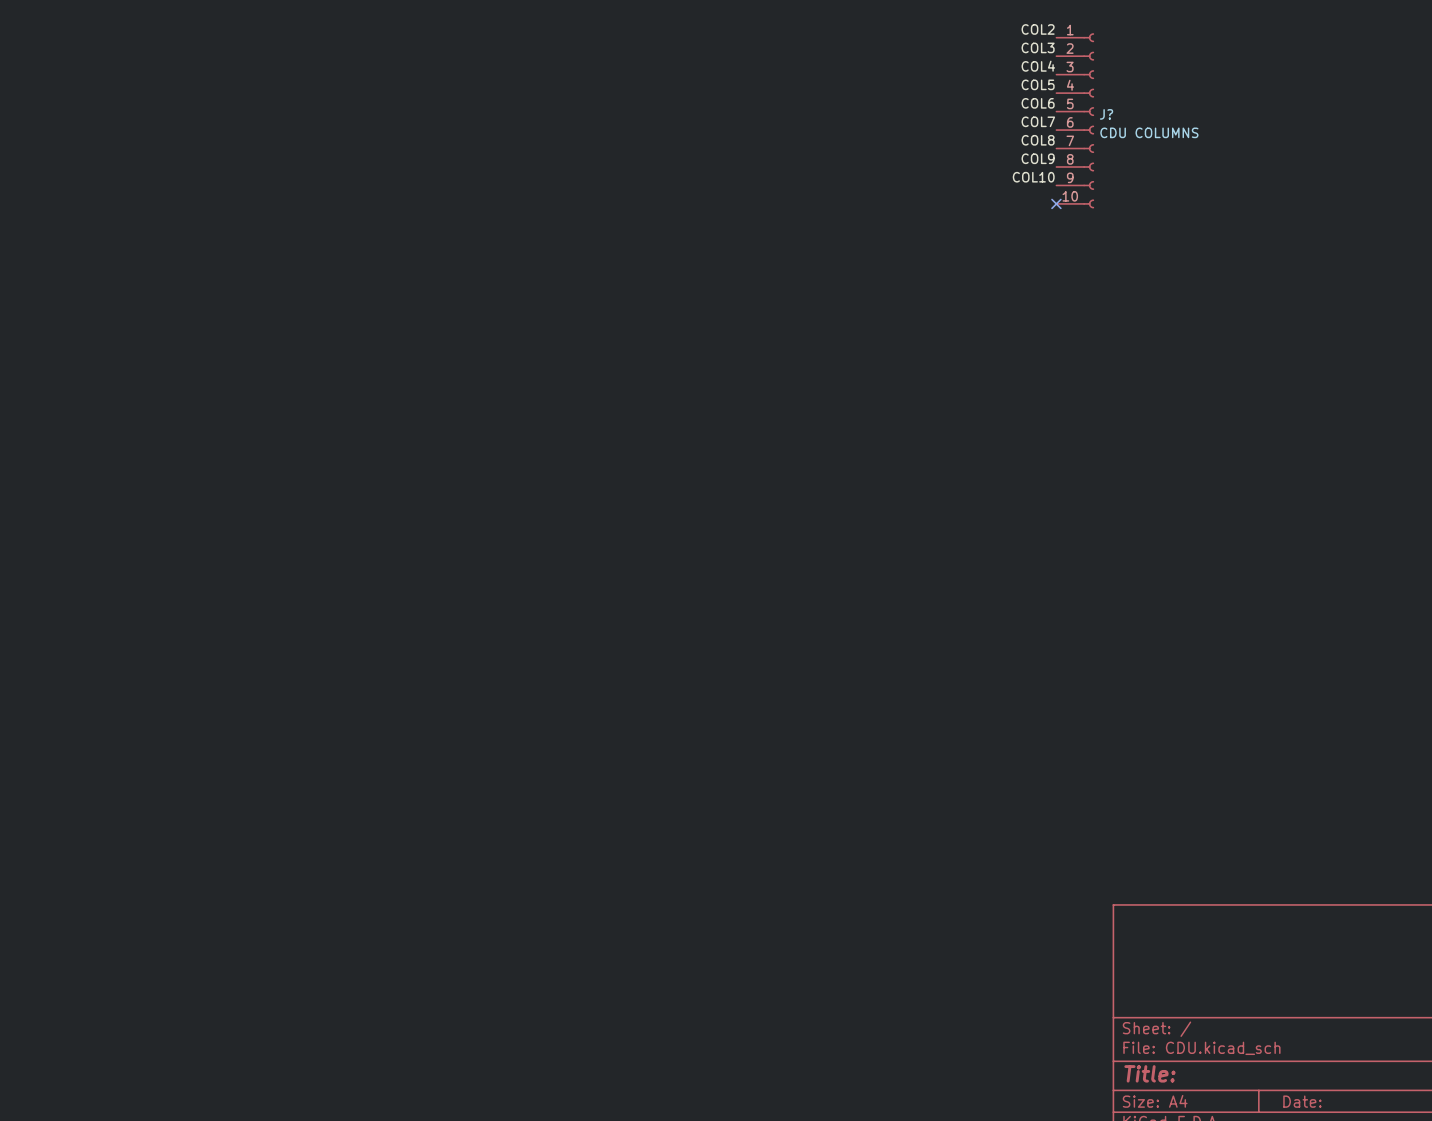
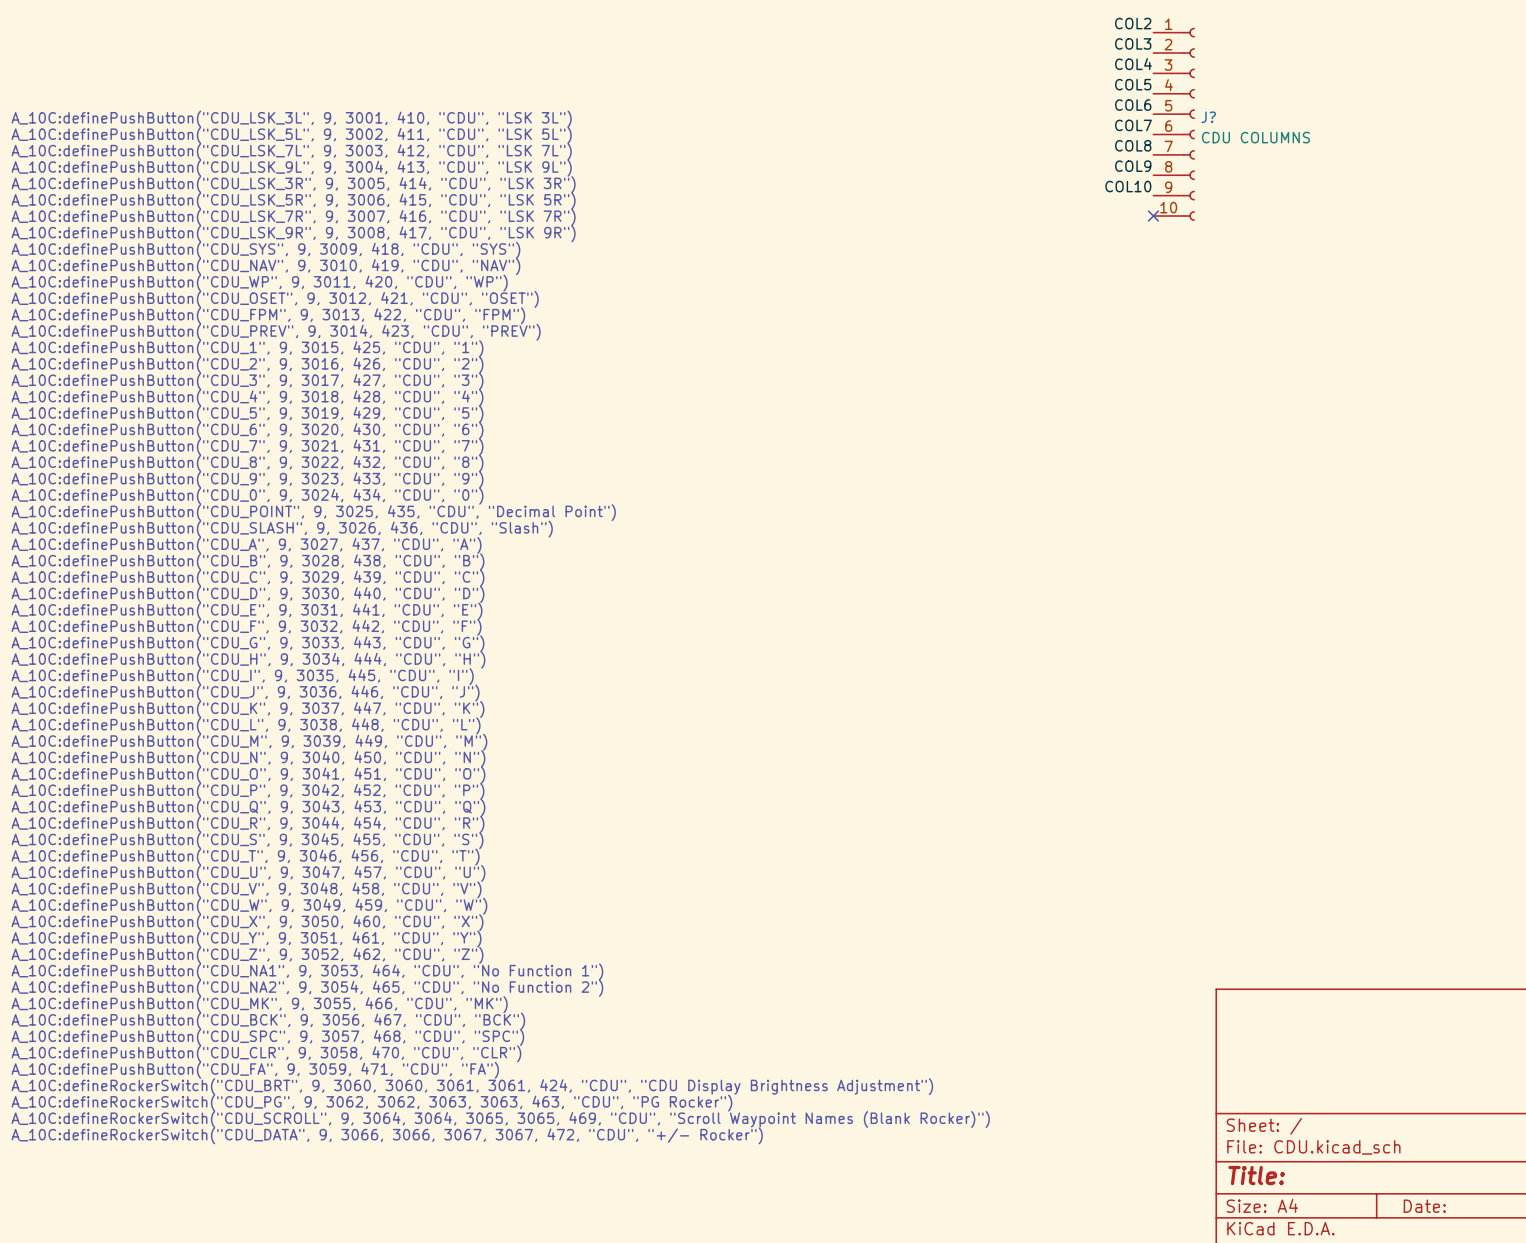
text: none -> A_10C:definePushButton("CDU_LSK_3L", 9, 3001, 410, "CDU", "LSK 3L") (291, 119)
text: none -> A_10C:definePushButton("CDU_LSK_5L", 9, 3002, 411, "CDU", "LSK 5L") (291, 135)
text: none -> A_10C:definePushButton("CDU_LSK_7L", 9, 3003, 412, "CDU", "LSK 7L") (291, 151)
text: none -> A_10C:definePushButton("CDU_LSK_9L", 9, 3004, 413, "CDU", "LSK 9L") (291, 168)
text: none -> A_10C:definePushButton("CDU_LSK_3R", 9, 3005, 414, "CDU", "LSK 3R") (293, 184)
text: none -> A_10C:definePushButton("CDU_LSK_5R", 9, 3006, 415, "CDU", "LSK 5R") (293, 201)
text: none -> A_10C:definePushButton("CDU_LSK_7R", 9, 3007, 416, "CDU", "LSK 7R") (293, 217)
text: none -> A_10C:definePushButton("CDU_LSK_9R", 9, 3008, 417, "CDU", "LSK 9R") (293, 233)
text: none -> A_10C:definePushButton("CDU_SYS", 9, 3009, 418, "CDU", "SYS") (265, 250)
text: none -> A_10C:definePushButton("CDU_NAV", 9, 3010, 419, "CDU", "NAV") (265, 266)
text: none -> A_10C:definePushButton("CDU_WP", 9, 3011, 420, "CDU", "WP") (259, 283)
text: none -> A_10C:definePushButton("CDU_OSET", 9, 3012, 421, "CDU", "OSET") (275, 299)
text: none -> A_10C:definePushButton("CDU_FPM", 9, 3013, 422, "CDU", "FPM") (268, 315)
text: none -> A_10C:definePushButton("CDU_PREV", 9, 3014, 423, "CDU", "PREV") (276, 332)
text: none -> A_10C:definePushButton("CDU_1", 9, 3015, 425, "CDU", "1") (247, 348)
text: none -> A_10C:definePushButton("CDU_2", 9, 3016, 426, "CDU", "2") (247, 365)
text: none -> A_10C:definePushButton("CDU_3", 9, 3017, 427, "CDU", "3") (247, 381)
text: none -> A_10C:definePushButton("CDU_4", 9, 3018, 428, "CDU", "4") (247, 397)
text: none -> A_10C:definePushButton("CDU_5", 9, 3019, 429, "CDU", "5") (247, 414)
text: none -> A_10C:definePushButton("CDU_6", 9, 3020, 430, "CDU", "6") (247, 430)
text: none -> A_10C:definePushButton("CDU_7", 9, 3021, 431, "CDU", "7") (247, 447)
text: none -> A_10C:definePushButton("CDU_8", 9, 3022, 432, "CDU", "8") (247, 463)
text: none -> A_10C:definePushButton("CDU_9", 9, 3023, 433, "CDU", "9") (247, 479)
text: none -> A_10C:definePushButton("CDU_0", 9, 3024, 434, "CDU", "0") (247, 496)
text: none -> A_10C:definePushButton("CDU_POINT", 9, 3025, 435, "CDU", "Decimal Point") (313, 512)
text: none -> A_10C:definePushButton("CDU_SLASH", 9, 3026, 436, "CDU", "Slash") (282, 529)
text: none -> A_10C:definePushButton("CDU_A", 9, 3027, 437, "CDU", "A") (246, 545)
text: none -> A_10C:definePushButton("CDU_B", 9, 3028, 438, "CDU", "B") (247, 561)
text: none -> A_10C:definePushButton("CDU_C", 9, 3029, 439, "CDU", "C") (247, 578)
text: none -> A_10C:definePushButton("CDU_D", 9, 3030, 440, "CDU", "D") (247, 594)
text: none -> A_10C:definePushButton("CDU_E", 9, 3031, 441, "CDU", "E") (247, 611)
text: none -> A_10C:definePushButton("CDU_F", 9, 3032, 442, "CDU", "F") (246, 627)
text: none -> A_10C:definePushButton("CDU_G", 9, 3033, 443, "CDU", "G") (247, 643)
text: none -> A_10C:definePushButton("CDU_H", 9, 3034, 444, "CDU", "H") (248, 660)
text: none -> A_10C:definePushButton("CDU_I", 9, 3035, 445, "CDU", "I") (242, 676)
text: none -> A_10C:definePushButton("CDU_J", 9, 3036, 446, "CDU", "J") (245, 693)
text: none -> A_10C:definePushButton("CDU_K", 9, 3037, 447, "CDU", "K") (247, 709)
text: none -> A_10C:definePushButton("CDU_L", 9, 3038, 448, "CDU", "L") (246, 725)
text: none -> A_10C:definePushButton("CDU_M", 9, 3039, 449, "CDU", "M") (249, 742)
text: none -> A_10C:definePushButton("CDU_N", 9, 3040, 450, "CDU", "N") (248, 758)
text: none -> A_10C:definePushButton("CDU_O", 9, 3041, 451, "CDU", "O") (248, 775)
text: none -> A_10C:definePushButton("CDU_P", 9, 3042, 452, "CDU", "P") (247, 791)
text: none -> A_10C:definePushButton("CDU_Q", 9, 3043, 453, "CDU", "Q") (248, 807)
text: none -> A_10C:definePushButton("CDU_R", 9, 3044, 454, "CDU", "R") (247, 824)
text: none -> A_10C:definePushButton("CDU_S", 9, 3045, 455, "CDU", "S") (247, 840)
text: none -> A_10C:definePushButton("CDU_T", 9, 3046, 456, "CDU", "T") (245, 857)
text: none -> A_10C:definePushButton("CDU_U", 9, 3047, 457, "CDU", "U") (248, 873)
text: none -> A_10C:definePushButton("CDU_V", 9, 3048, 458, "CDU", "V") (246, 889)
text: none -> A_10C:definePushButton("CDU_W", 9, 3049, 459, "CDU", "W") (249, 906)
text: none -> A_10C:definePushButton("CDU_X", 9, 3050, 460, "CDU", "X") (247, 922)
text: none -> A_10C:definePushButton("CDU_Y", 9, 3051, 461, "CDU", "Y") (246, 939)
text: none -> A_10C:definePushButton("CDU_Z", 9, 3052, 462, "CDU", "Z") (247, 955)
text: none -> A_10C:definePushButton("CDU_NA1", 9, 3053, 464, "CDU", "No Function 1") (307, 971)
text: none -> A_10C:definePushButton("CDU_NA2", 9, 3054, 465, "CDU", "No Function 2") (307, 988)
text: none -> A_10C:definePushButton("CDU_MK", 9, 3055, 466, "CDU", "MK") (259, 1004)
text: none -> A_10C:definePushButton("CDU_BCK", 9, 3056, 467, "CDU", "BCK") (268, 1021)
text: none -> A_10C:definePushButton("CDU_SPC", 9, 3057, 468, "CDU", "SPC") (267, 1037)
text: none -> A_10C:definePushButton("CDU_CLR", 9, 3058, 470, "CDU", "CLR") (266, 1053)
text: none -> A_10C:definePushButton("CDU_FA", 9, 3059, 471, "CDU", "FA") (255, 1070)
text: none -> A_10C:defineRockerSwitch("CDU_BRT", 9, 3060, 3060, 3061, 3061, 424, "CDU", "CDU Display Brightness Adjustment") (472, 1086)
text: none -> A_10C:defineRockerSwitch("CDU_PG", 9, 3062, 3062, 3063, 3063, 463, "CDU", "PG Rocker") (371, 1103)
text: none -> A_10C:defineRockerSwitch("CDU_SCROLL", 9, 3064, 3064, 3065, 3065, 469, "CDU", "Scroll Waypoint Names (Blank Rocker)") (500, 1119)
text: none -> A_10C:defineRockerSwitch("CDU_DATA", 9, 3066, 3066, 3067, 3067, 472, "CDU", "+/- Rocker") (387, 1135)

